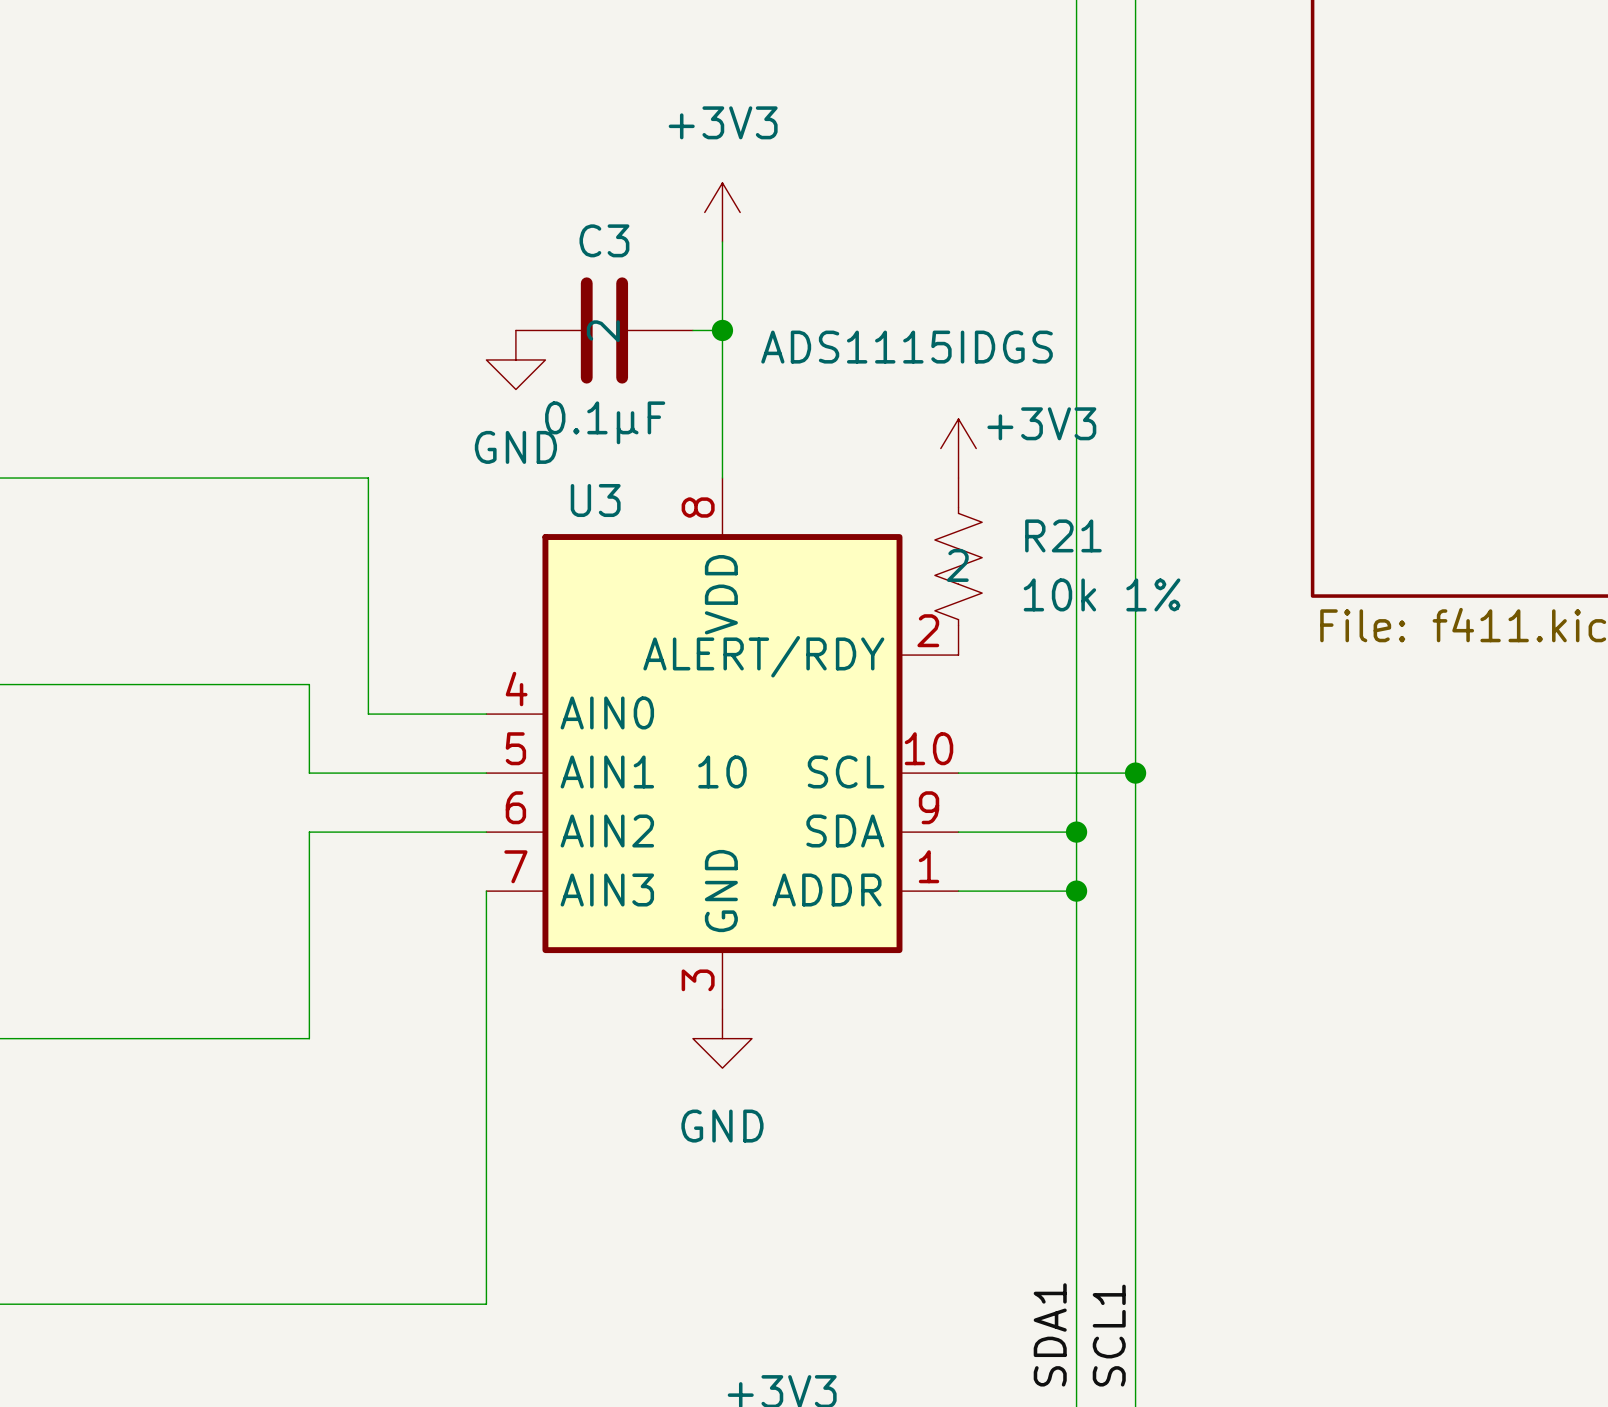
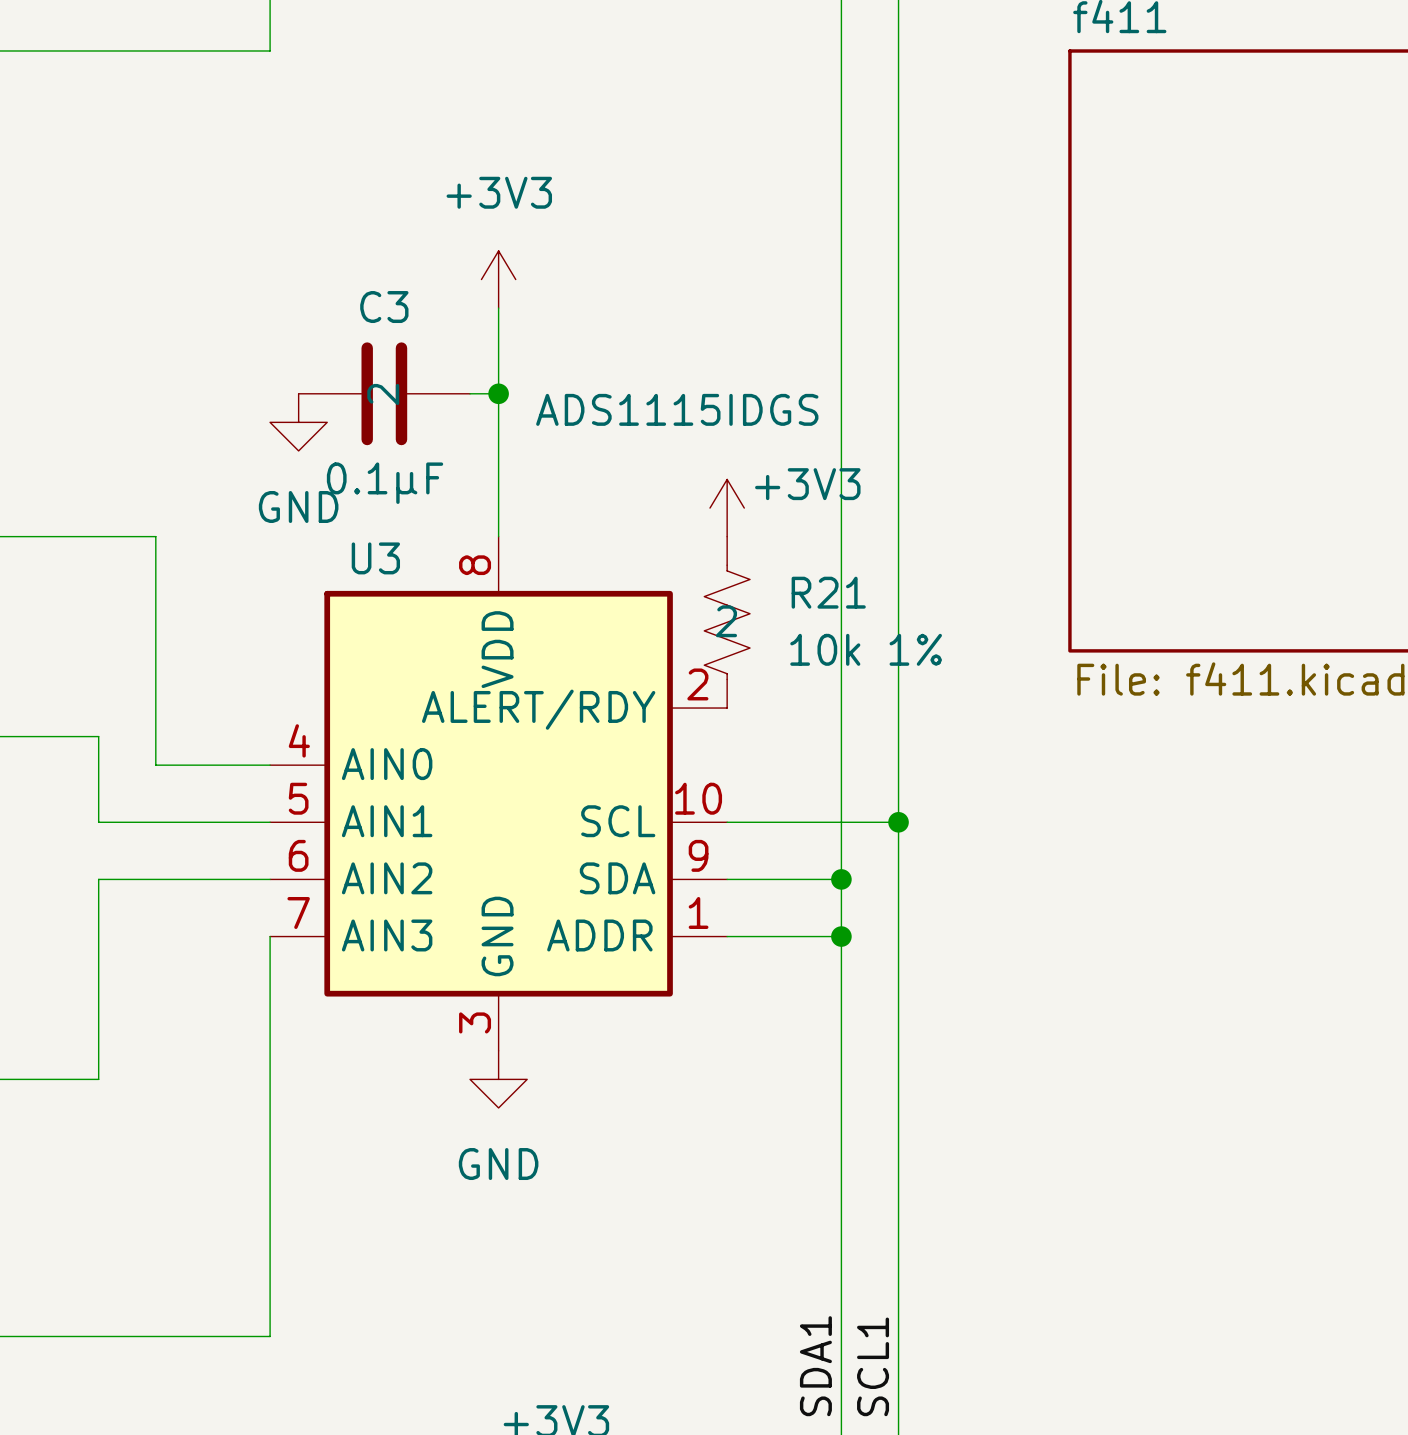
U3 text: 10 (722, 771) -> none

